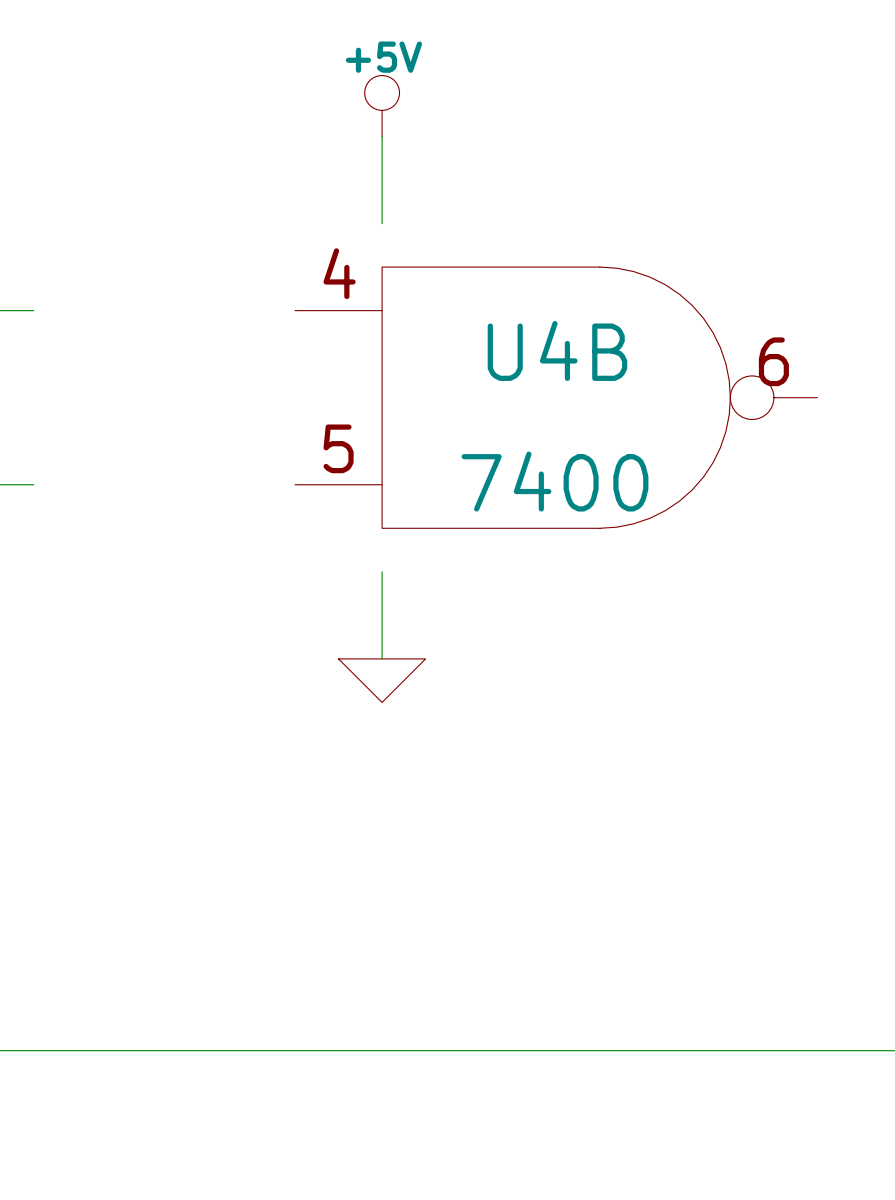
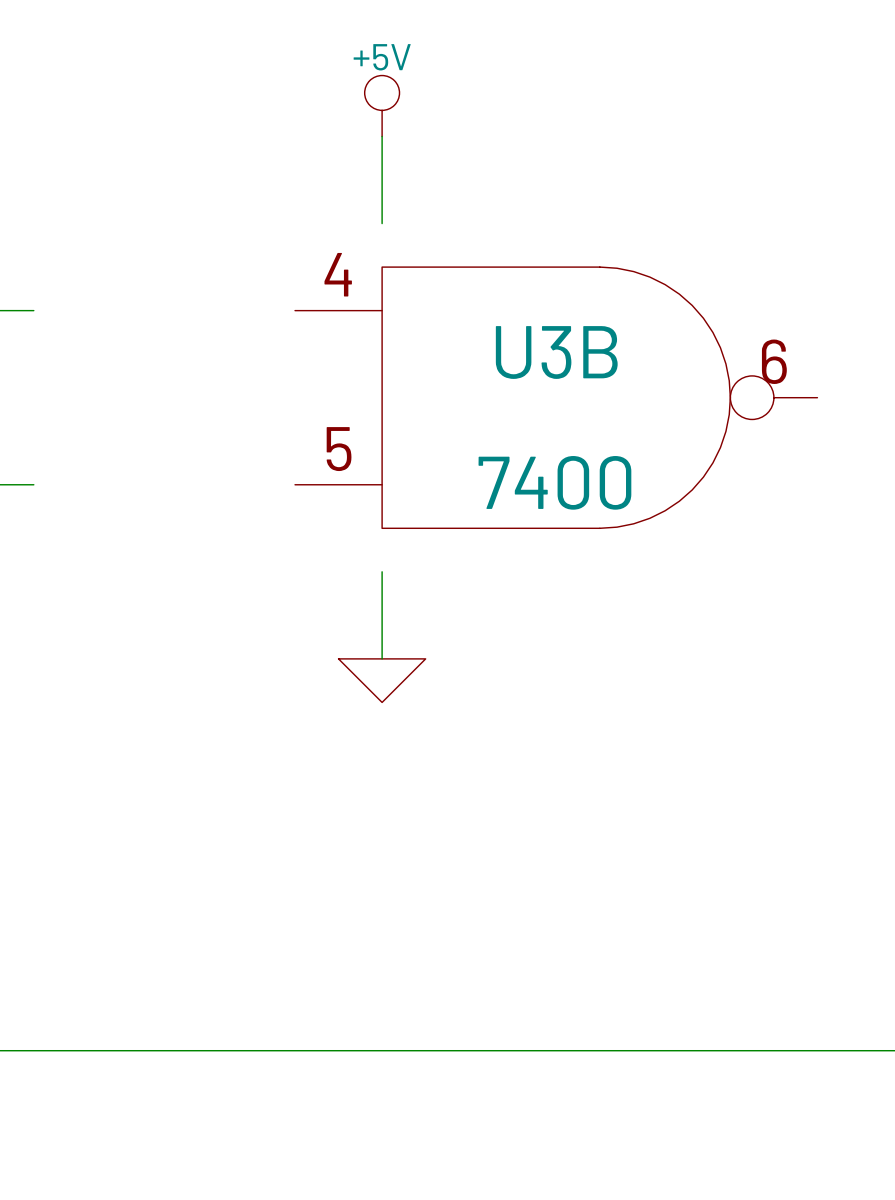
U4B name: U4B (557, 350) -> U3B (556, 352)

